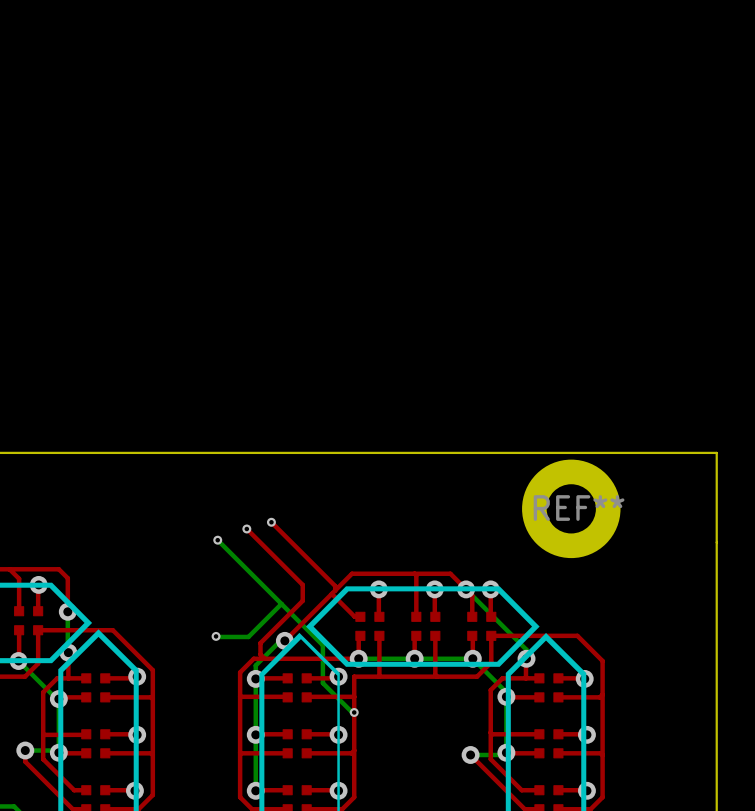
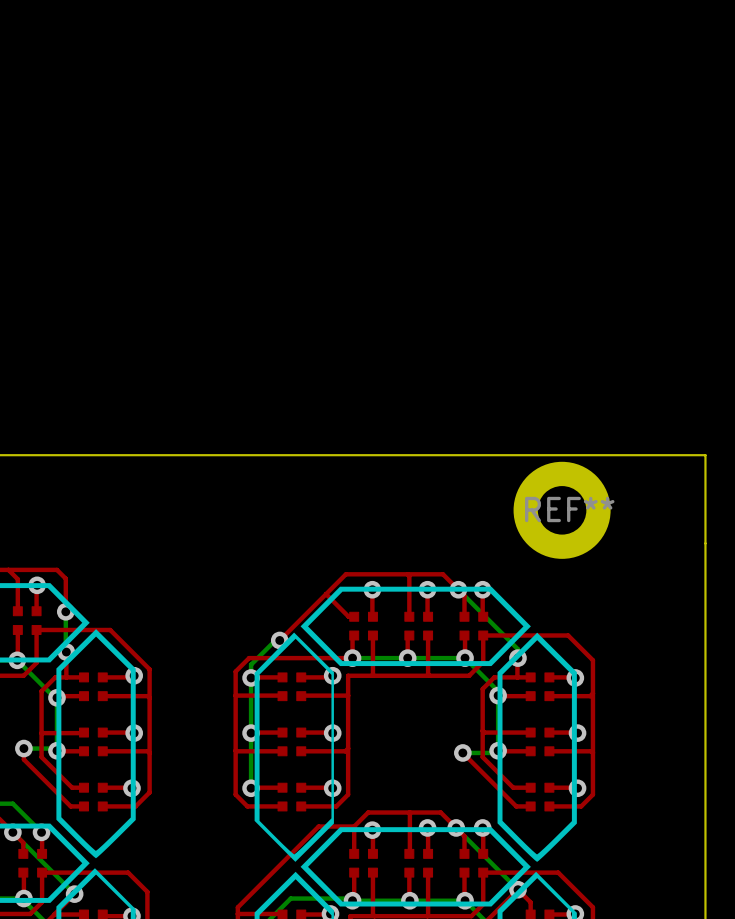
top track: (271, 522) (335, 586) (335, 590) -> none
via: (271, 522) -> none
top track: (246, 528) (302, 584) (302, 600) (260, 643) (260, 654) (264, 658) -> none
via: (246, 528) -> none
bottom track: (217, 540) (322, 645) (322, 683) (354, 712) -> none
via: (217, 540) -> none
bottom track: (281, 603) (248, 636) (216, 636) -> none
via: (216, 636) -> none
via: (354, 712) -> none

